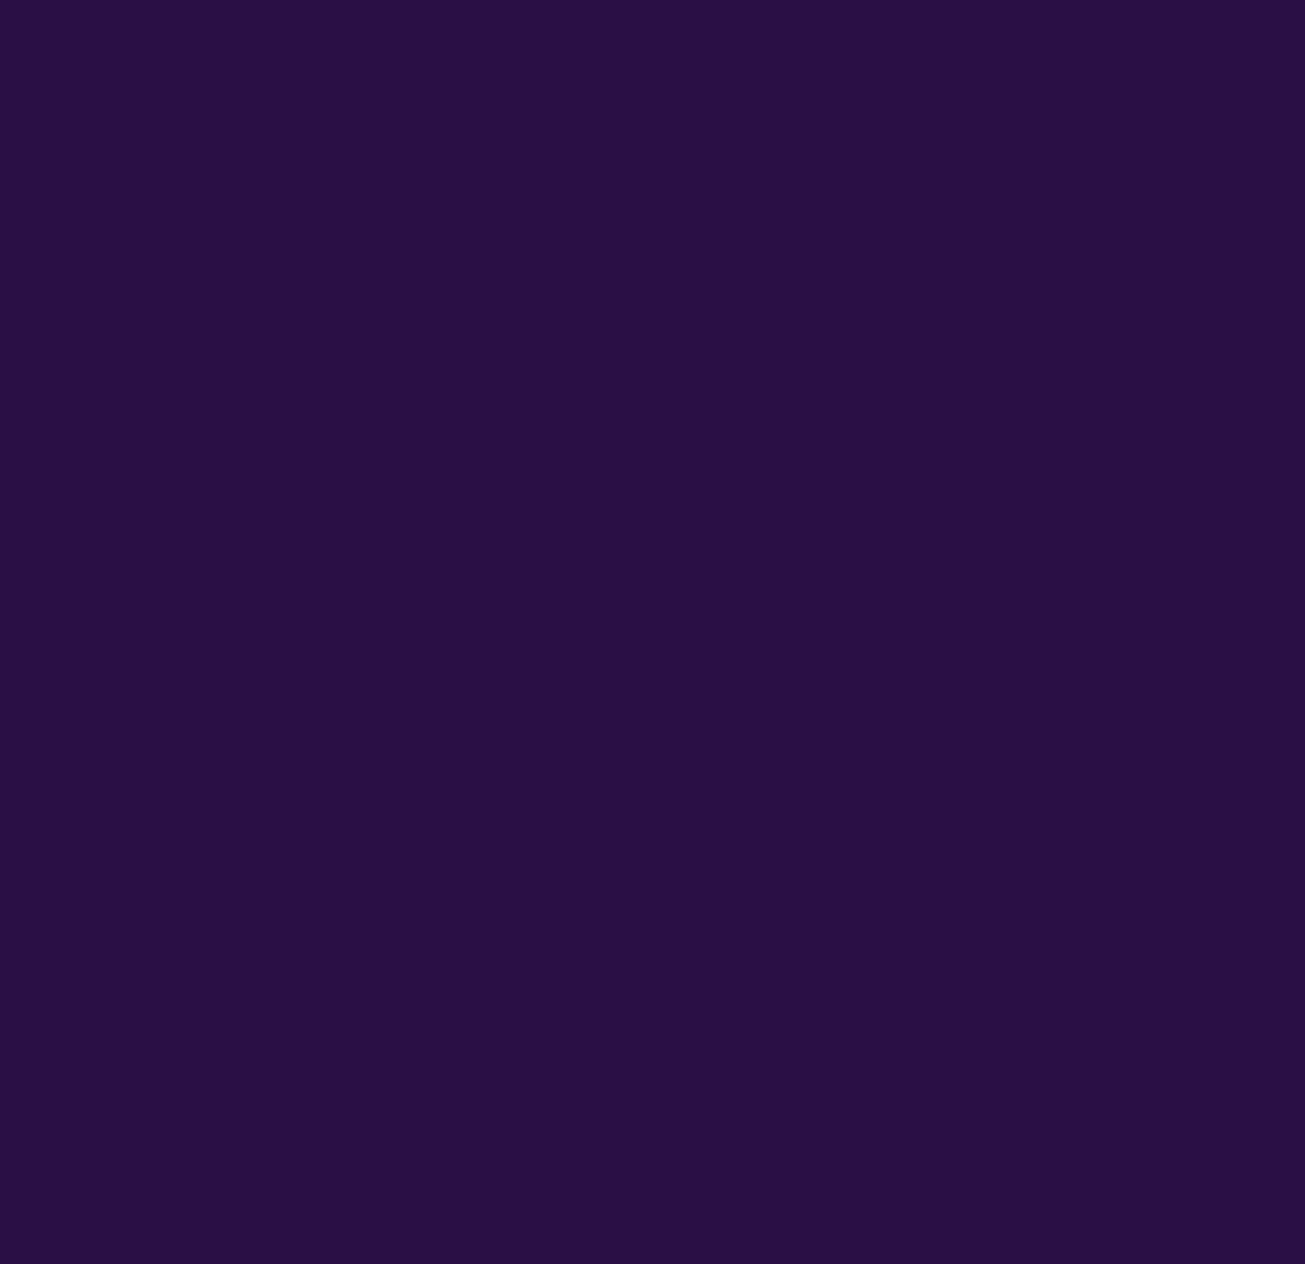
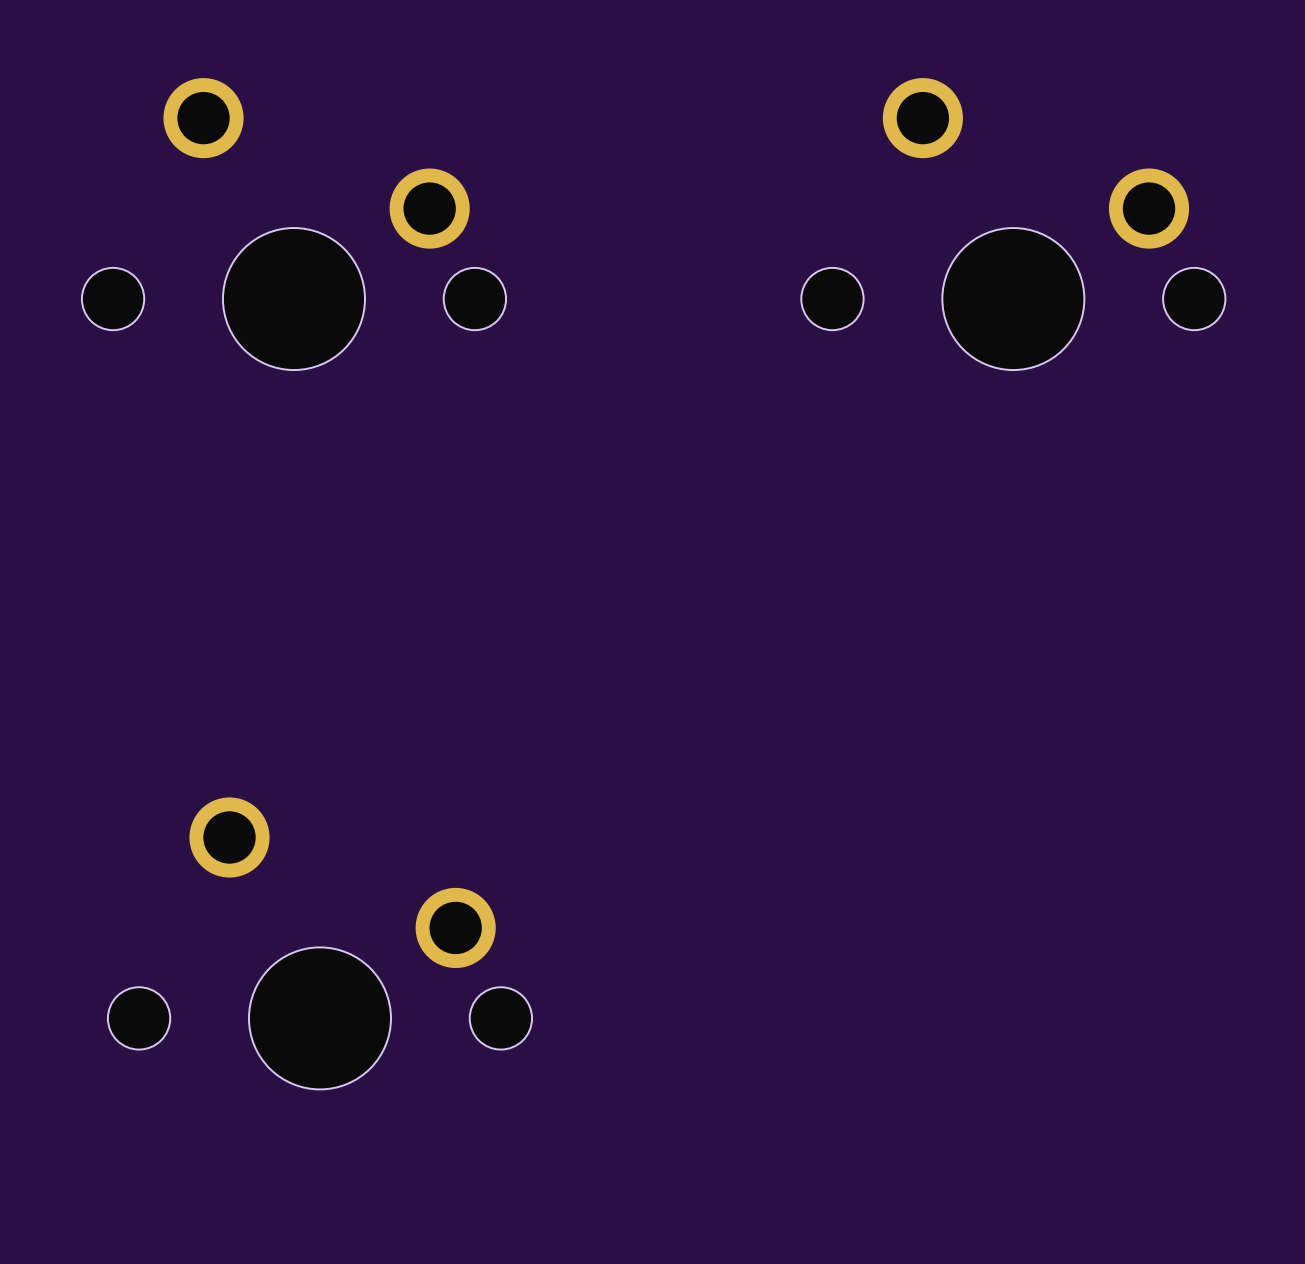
part: none -> (293, 224)
part: none -> (1013, 224)
part: none -> (319, 943)

